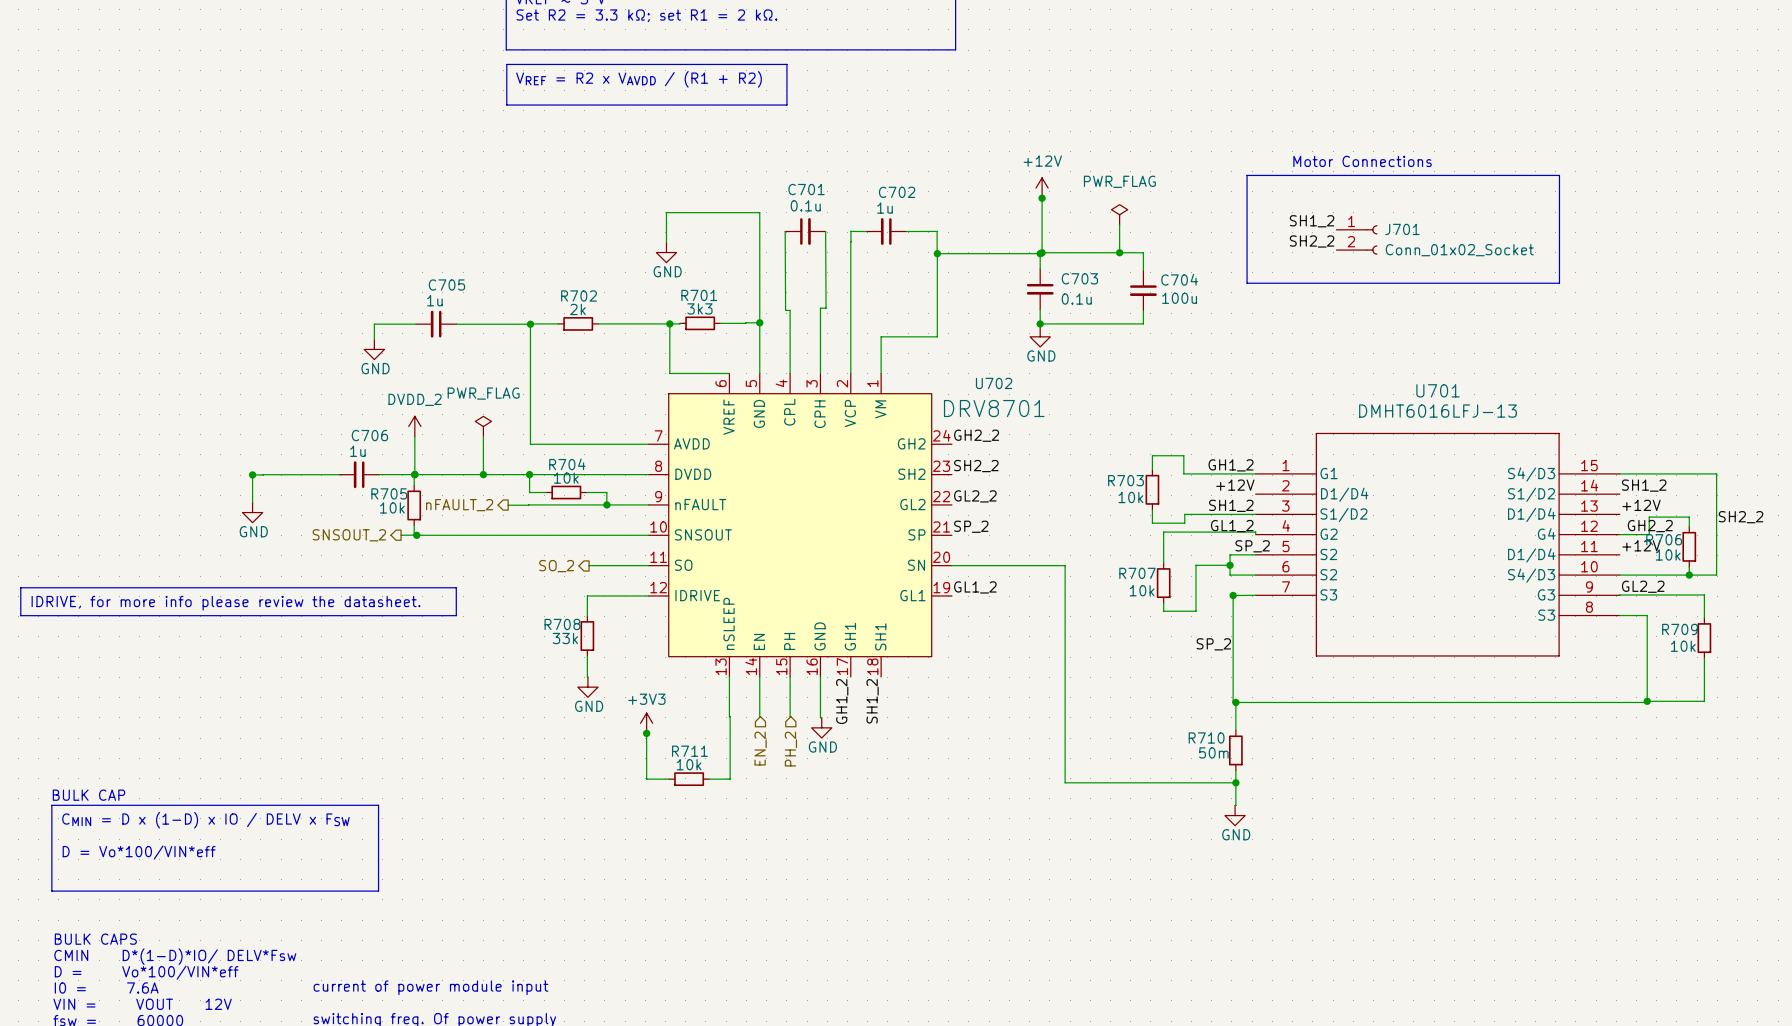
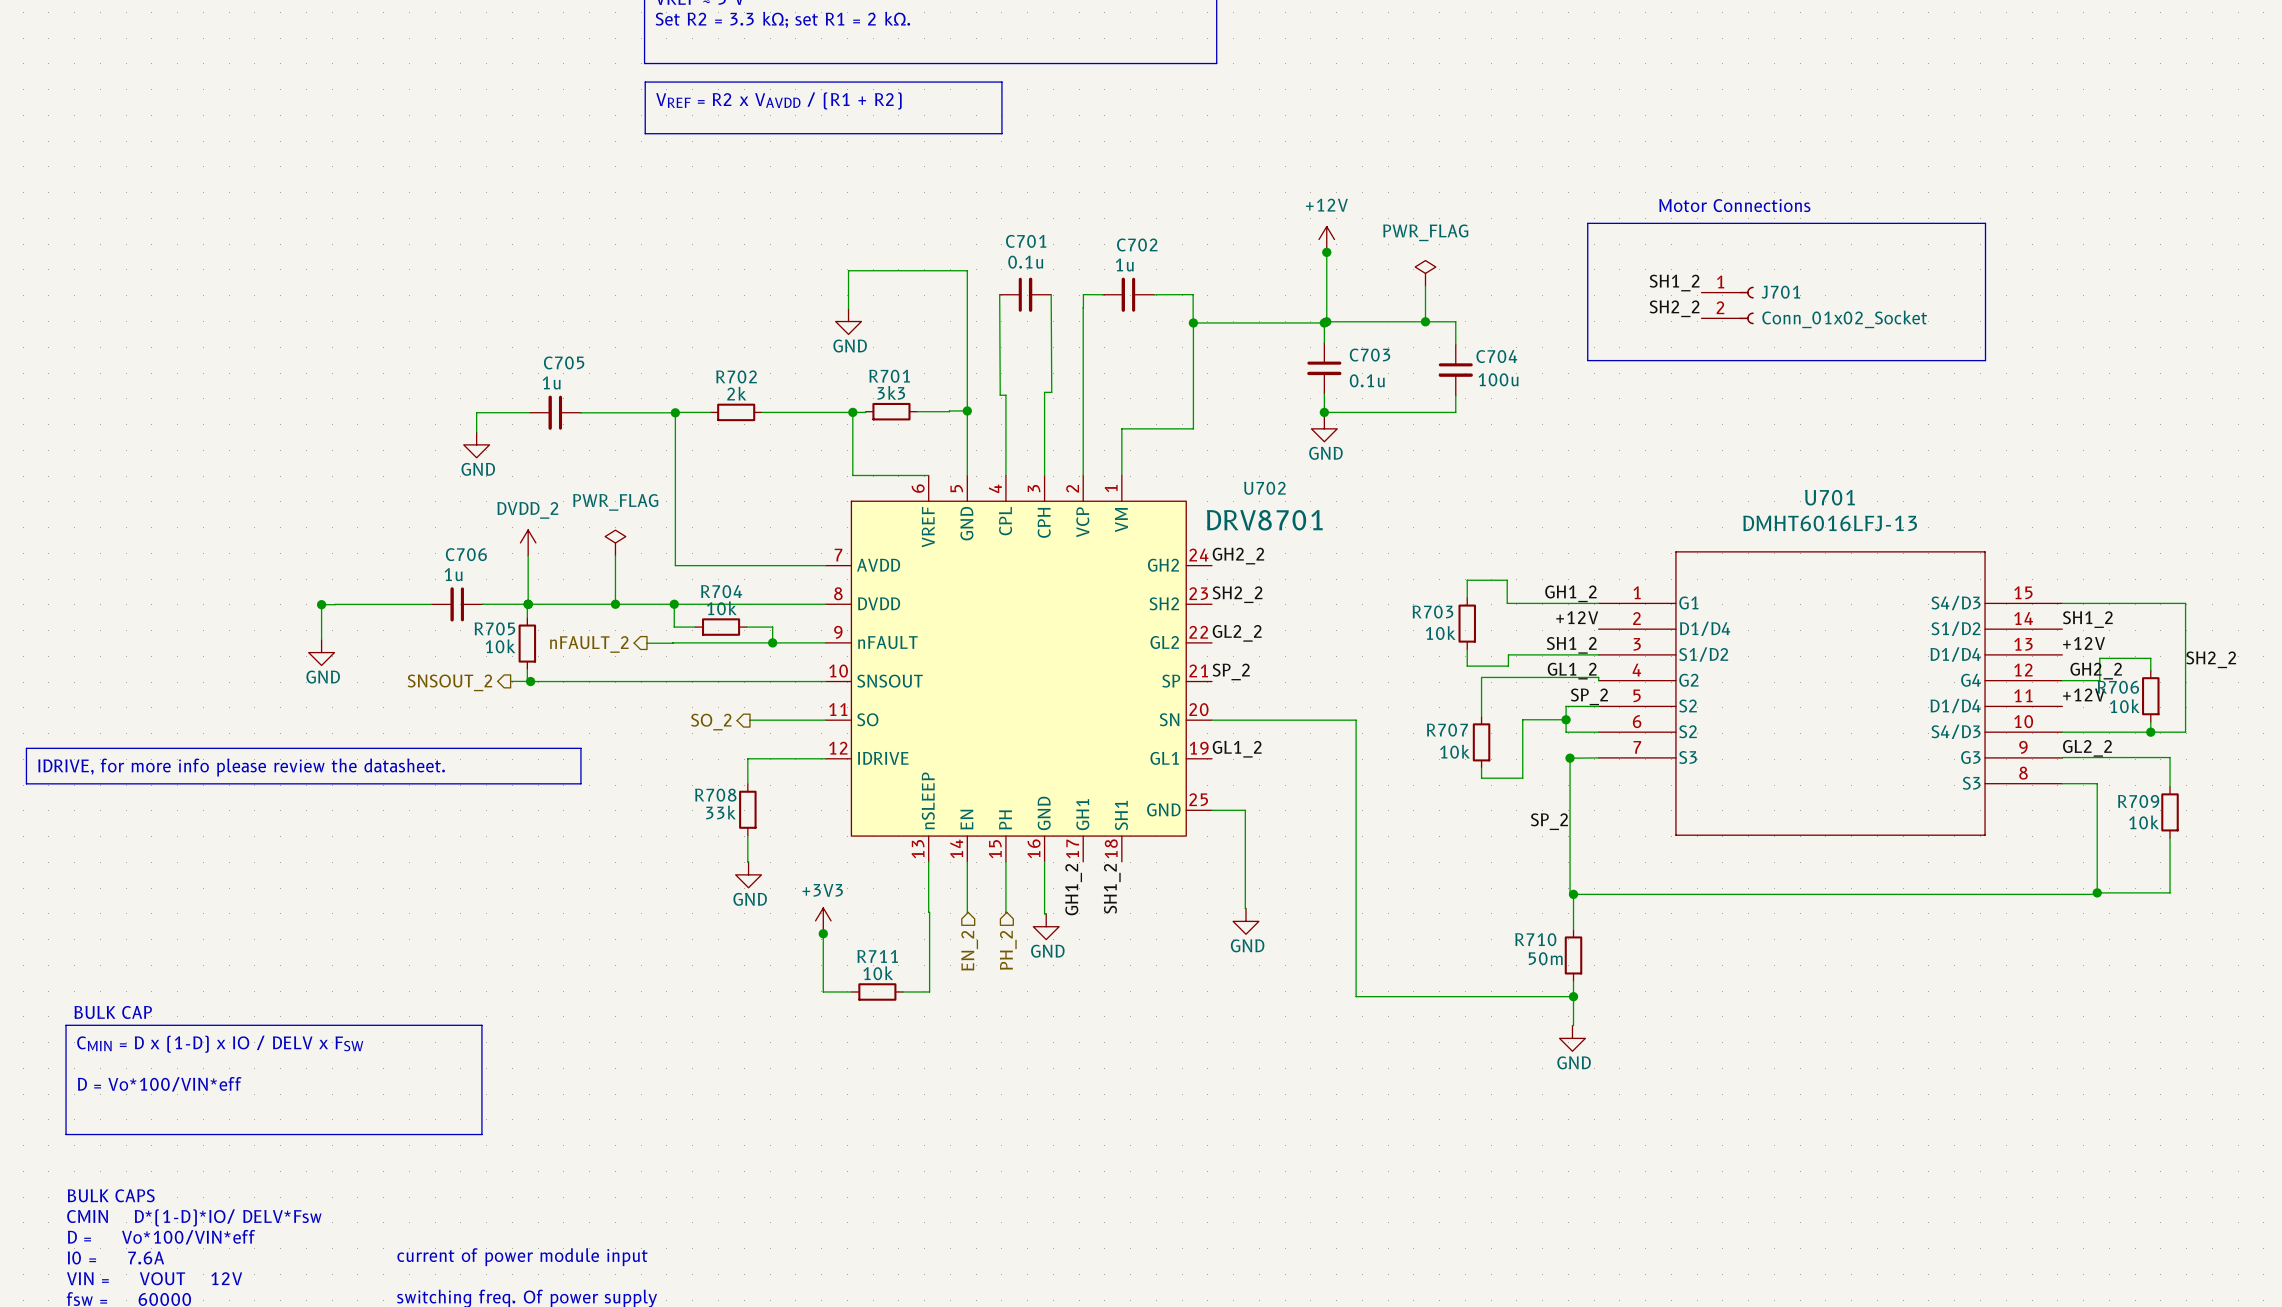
U702 symbol: [648, 373, 952, 677] -> [825, 475, 1212, 862]
wire: none -> (1211, 810) (1245, 810) (1246, 908)
power symbol: none -> GND (1246, 921)

